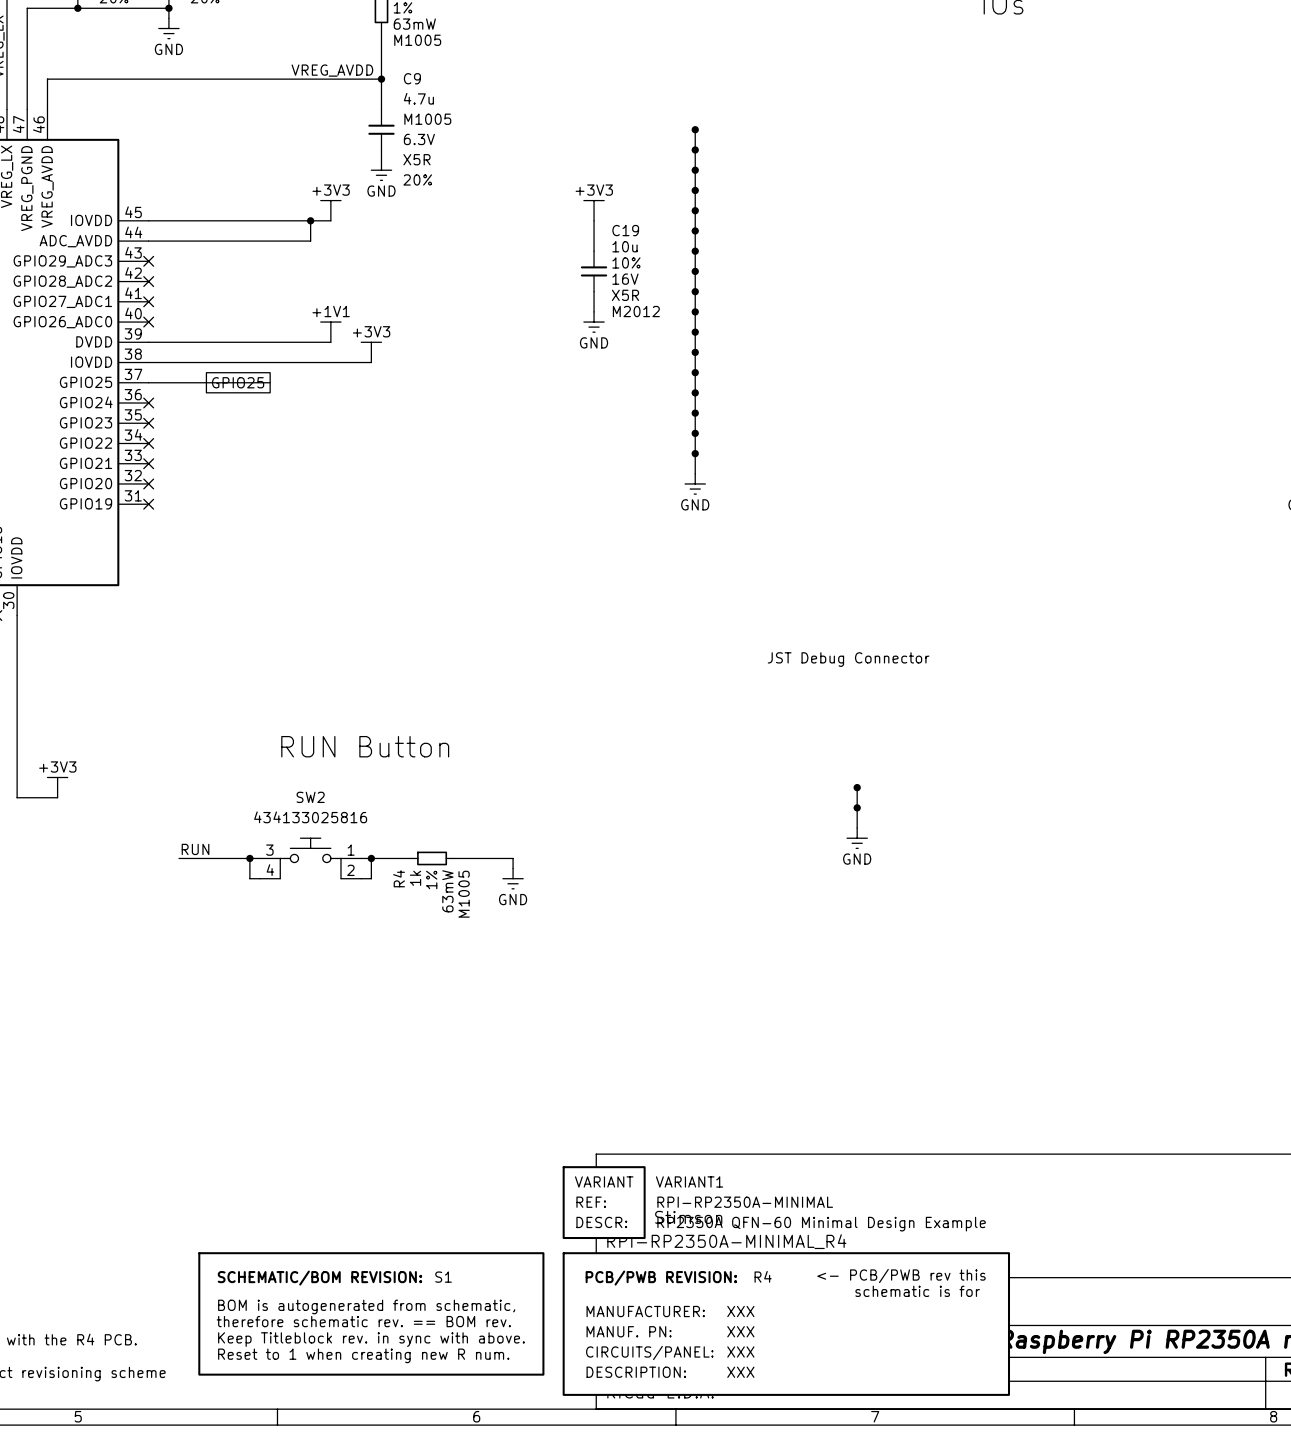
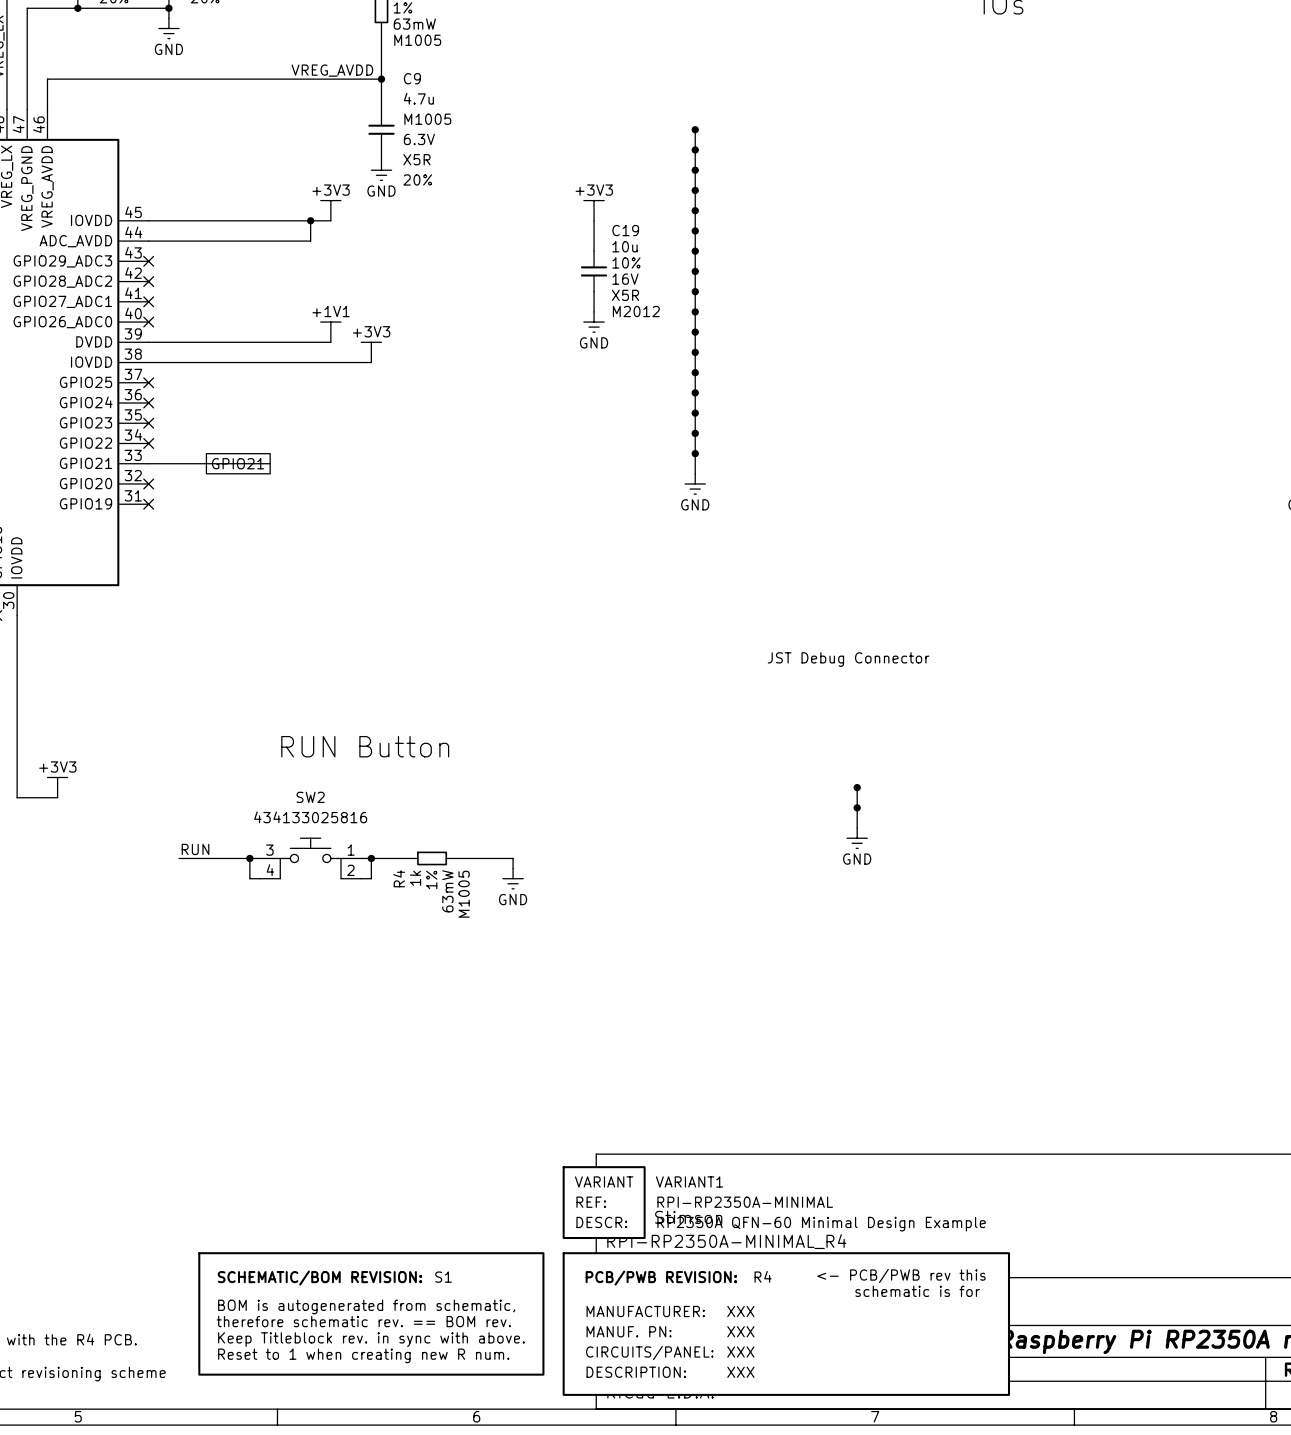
wire: (148, 382) (270, 382) -> (148, 463) (270, 463)
no-connect mark: none -> (148, 382)
global label: GPIO25 (238, 382) -> none
no-connect mark: (148, 463) -> none
global label: none -> GPIO21 (238, 463)

